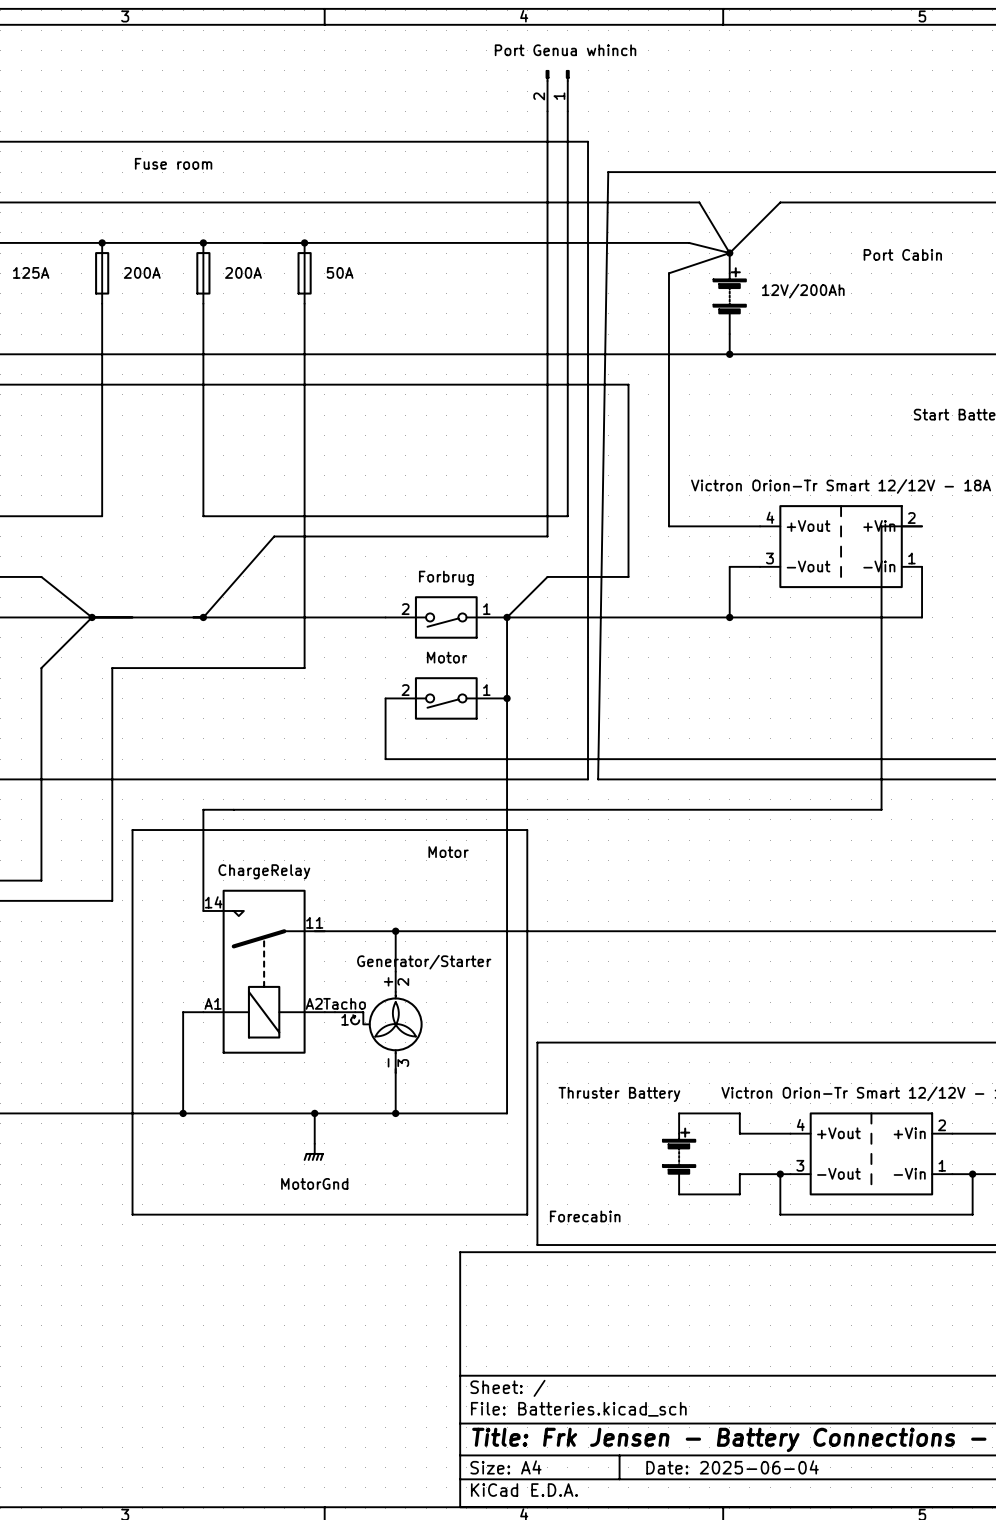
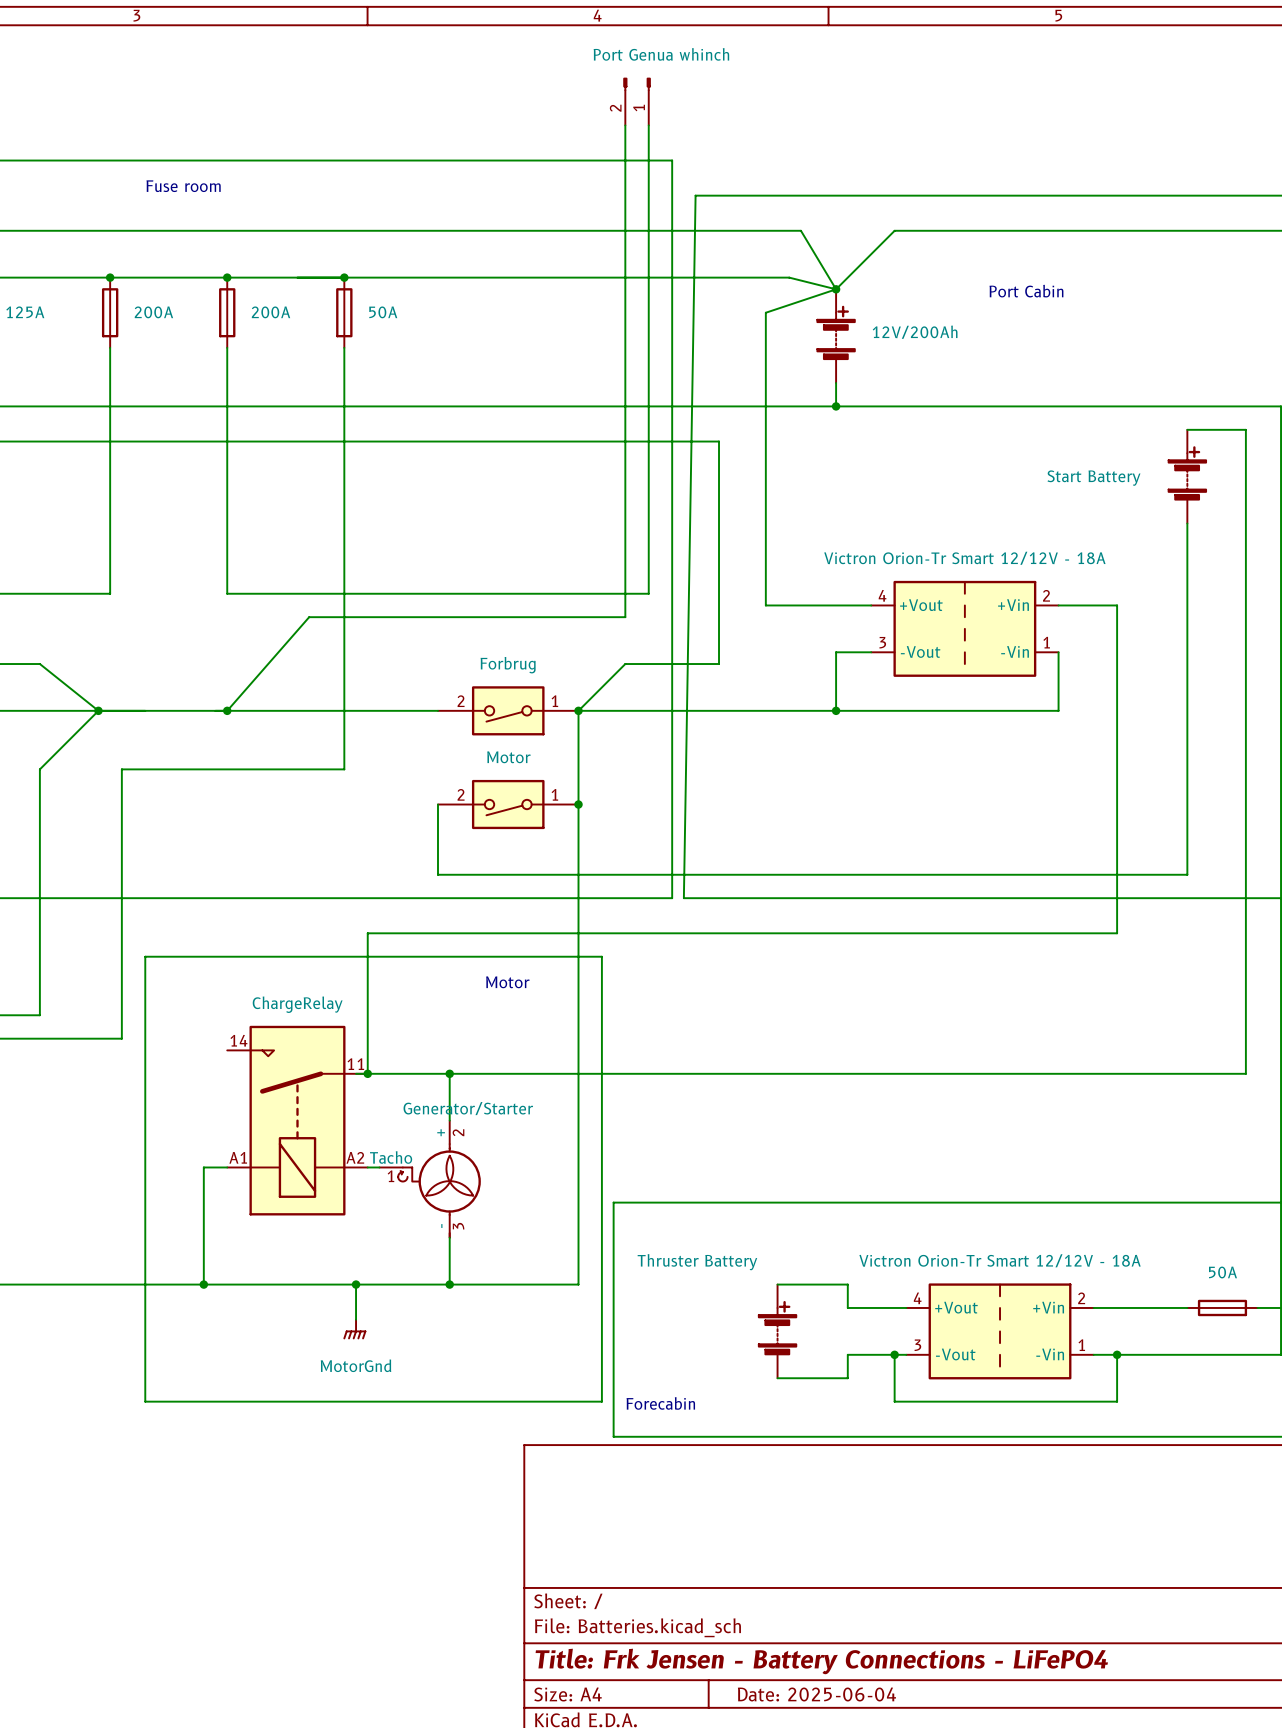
wire: (922, 526) (881, 526) (881, 809) -> (1058, 605) (1117, 605) (1117, 933) (1011, 933)
wire: (324, 809) (203, 809) (203, 910) -> (367, 933) (367, 1073)
junction: none -> (367, 1073)

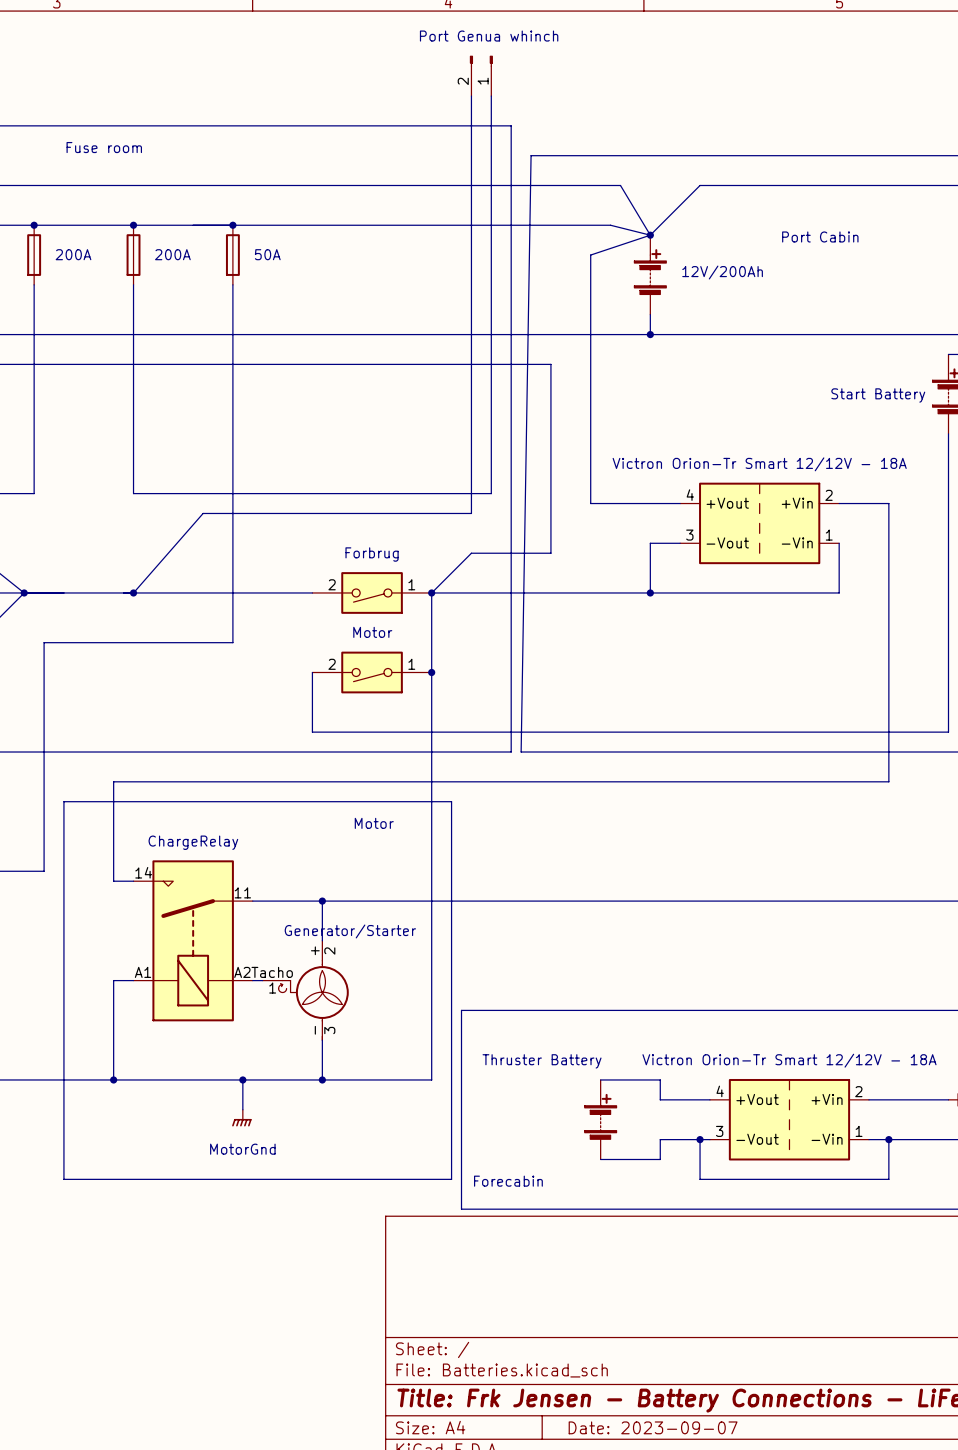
wire: (367, 933) (367, 1073) (356, 1073) -> (252, 781) (113, 781) (113, 881) (133, 881)
junction: (367, 1073) -> none
title block: Date: 2025-06-04 (816, 1694) -> Date: 2023-09-07 (653, 1427)

